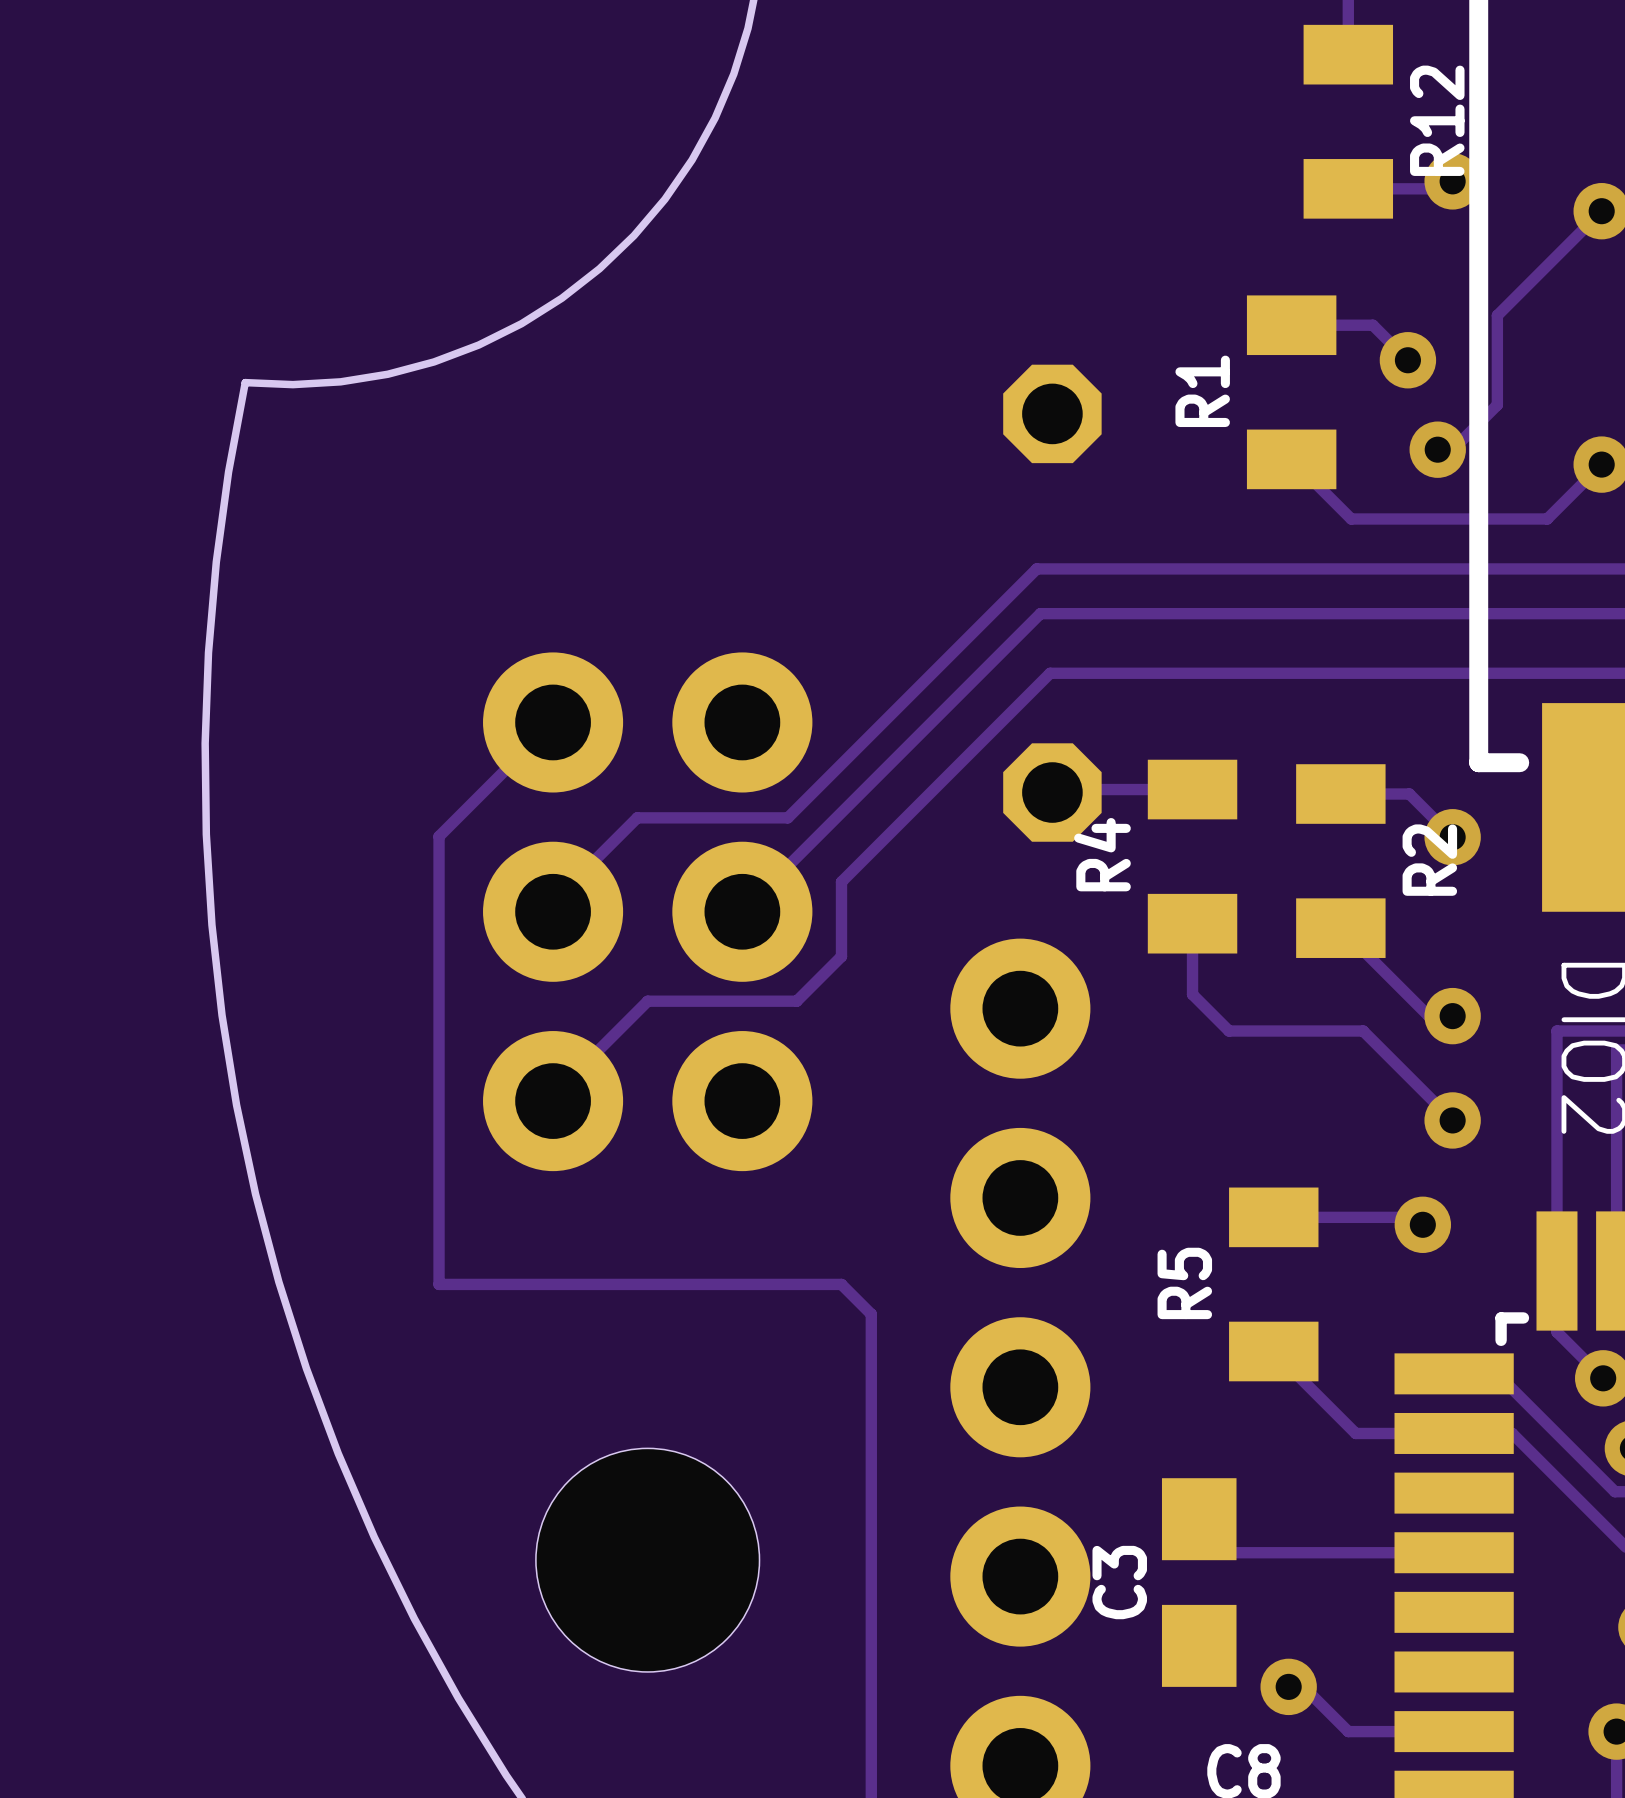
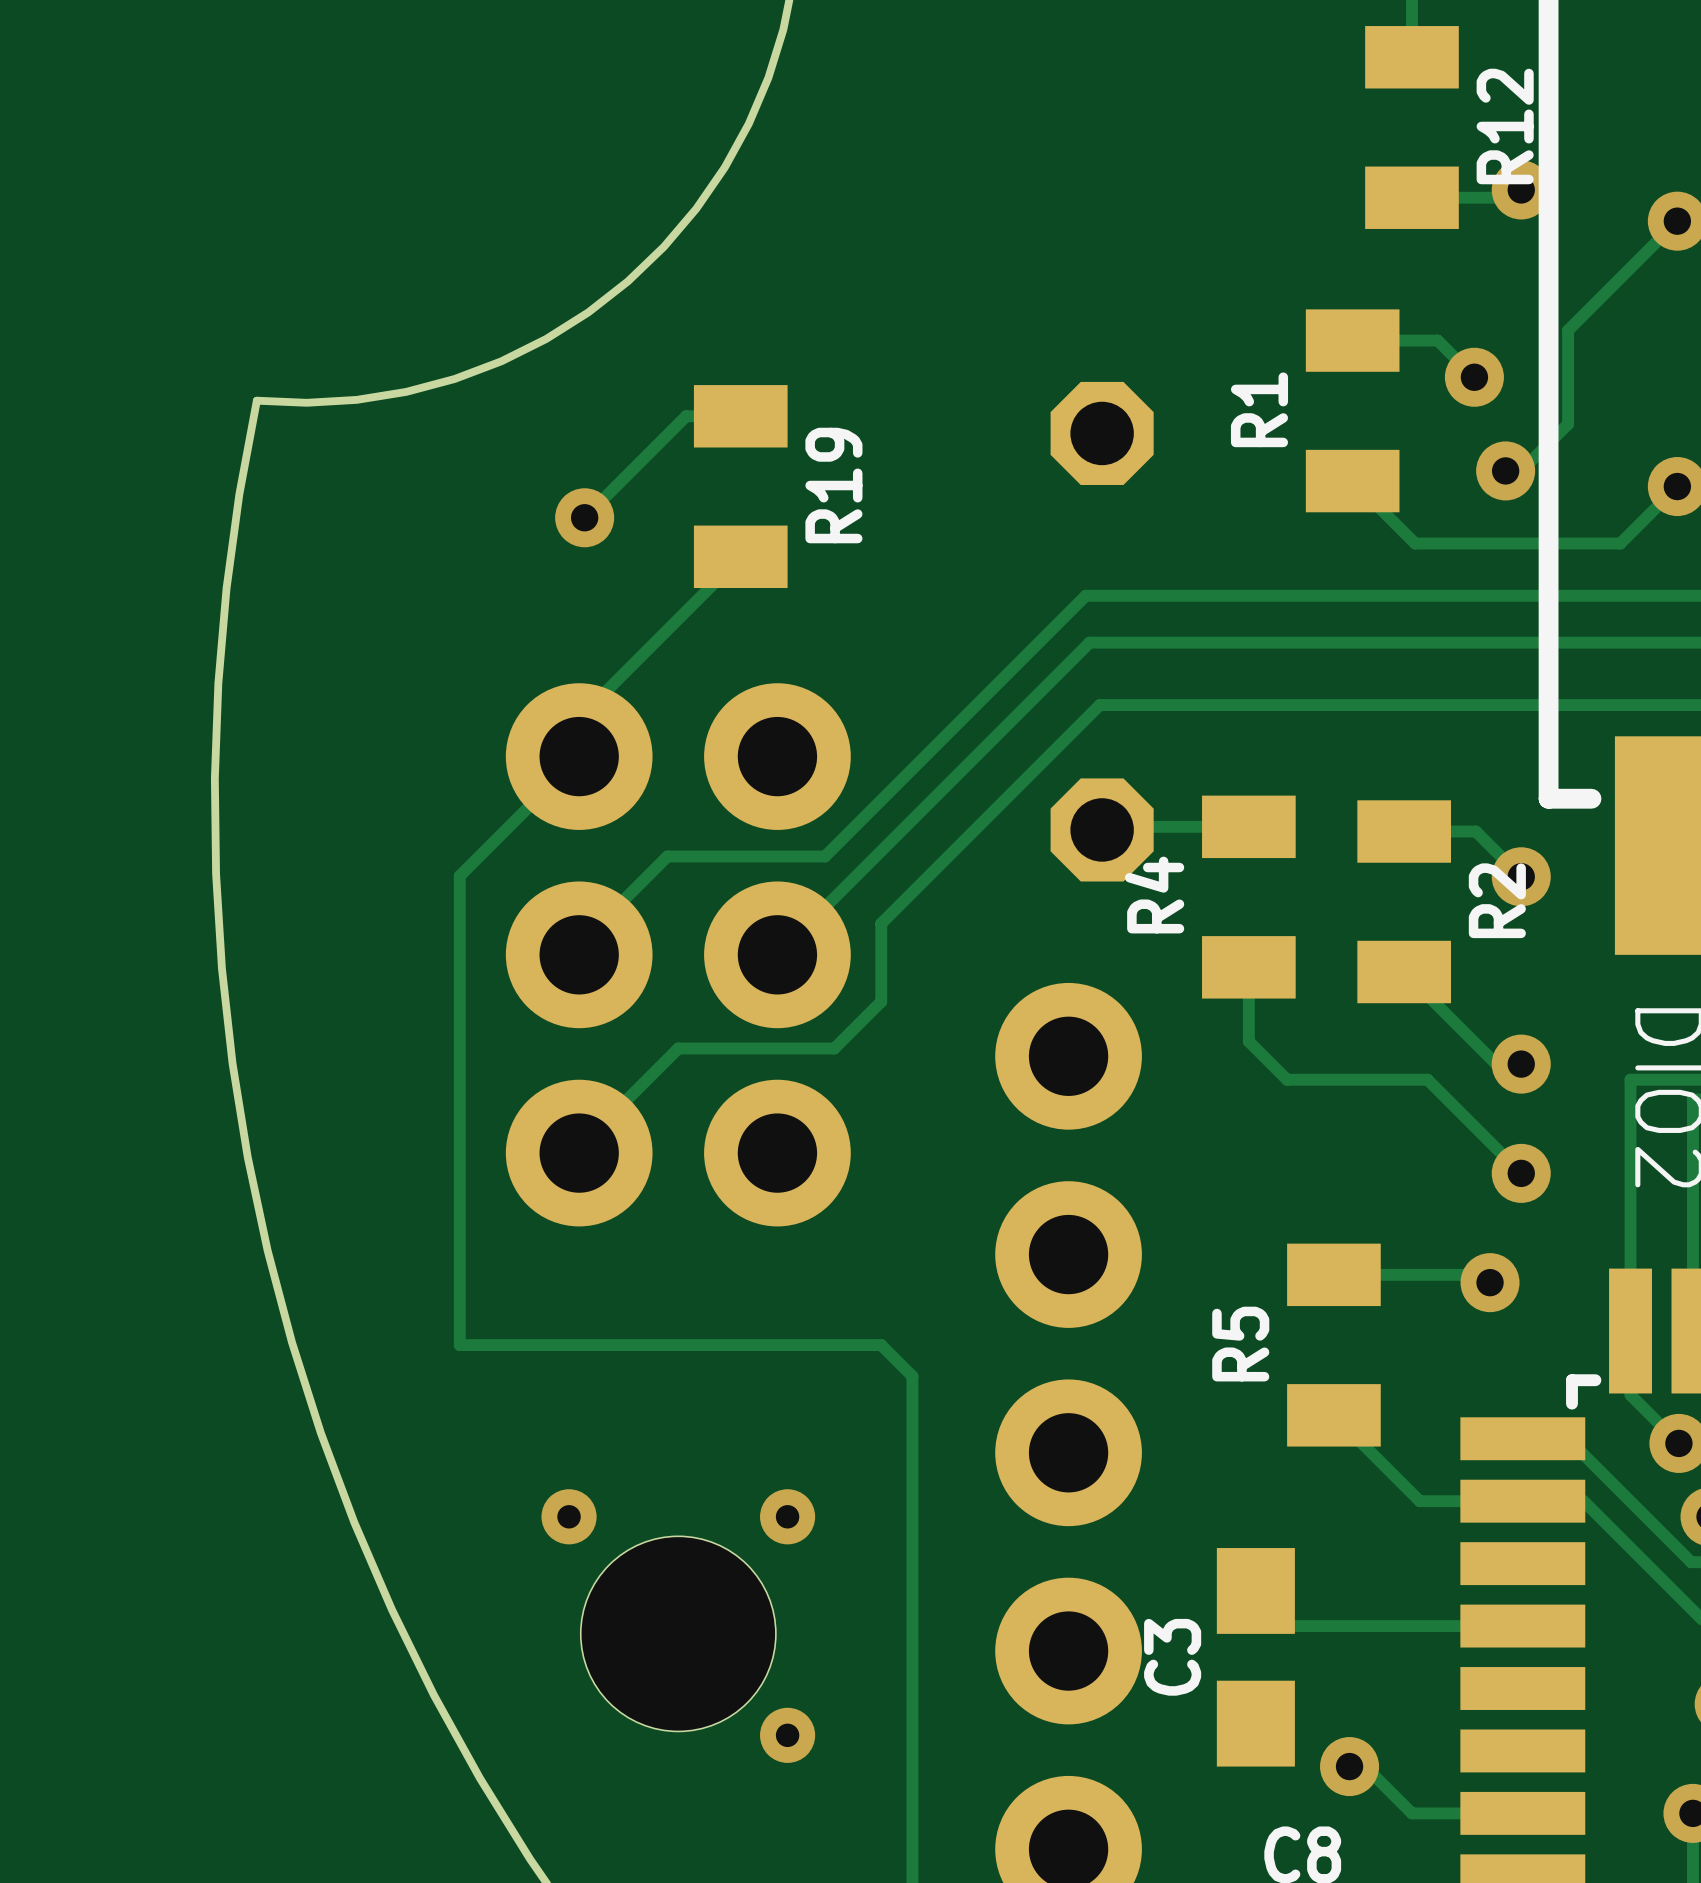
track: none -> (740, 416) (686, 416) (584, 517)
R19: none -> (740, 486)
via: none -> (584, 517)
track: none -> (740, 556) (579, 718) (579, 756)
hole size: [535, 1448, 760, 1672] -> [580, 1536, 776, 1732]
via: none -> (569, 1516)
via: none -> (787, 1516)
via: none -> (787, 1735)

